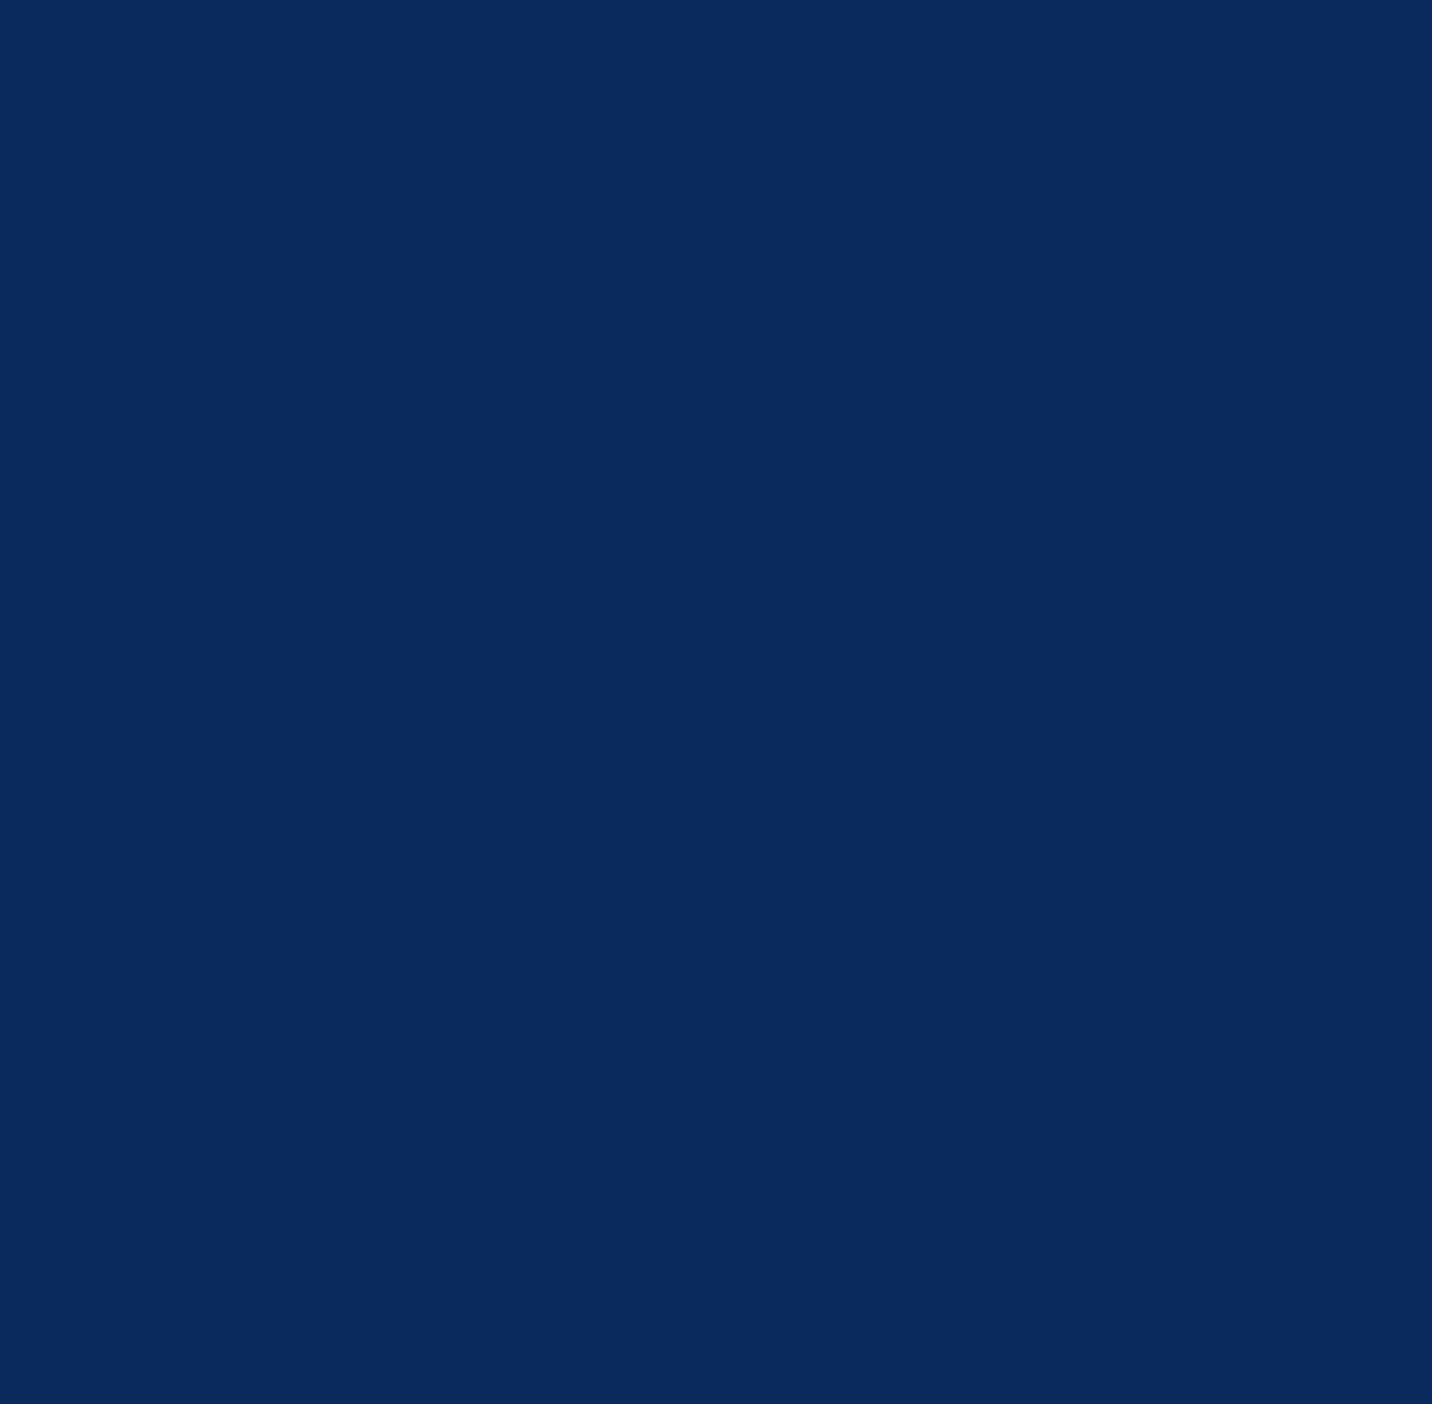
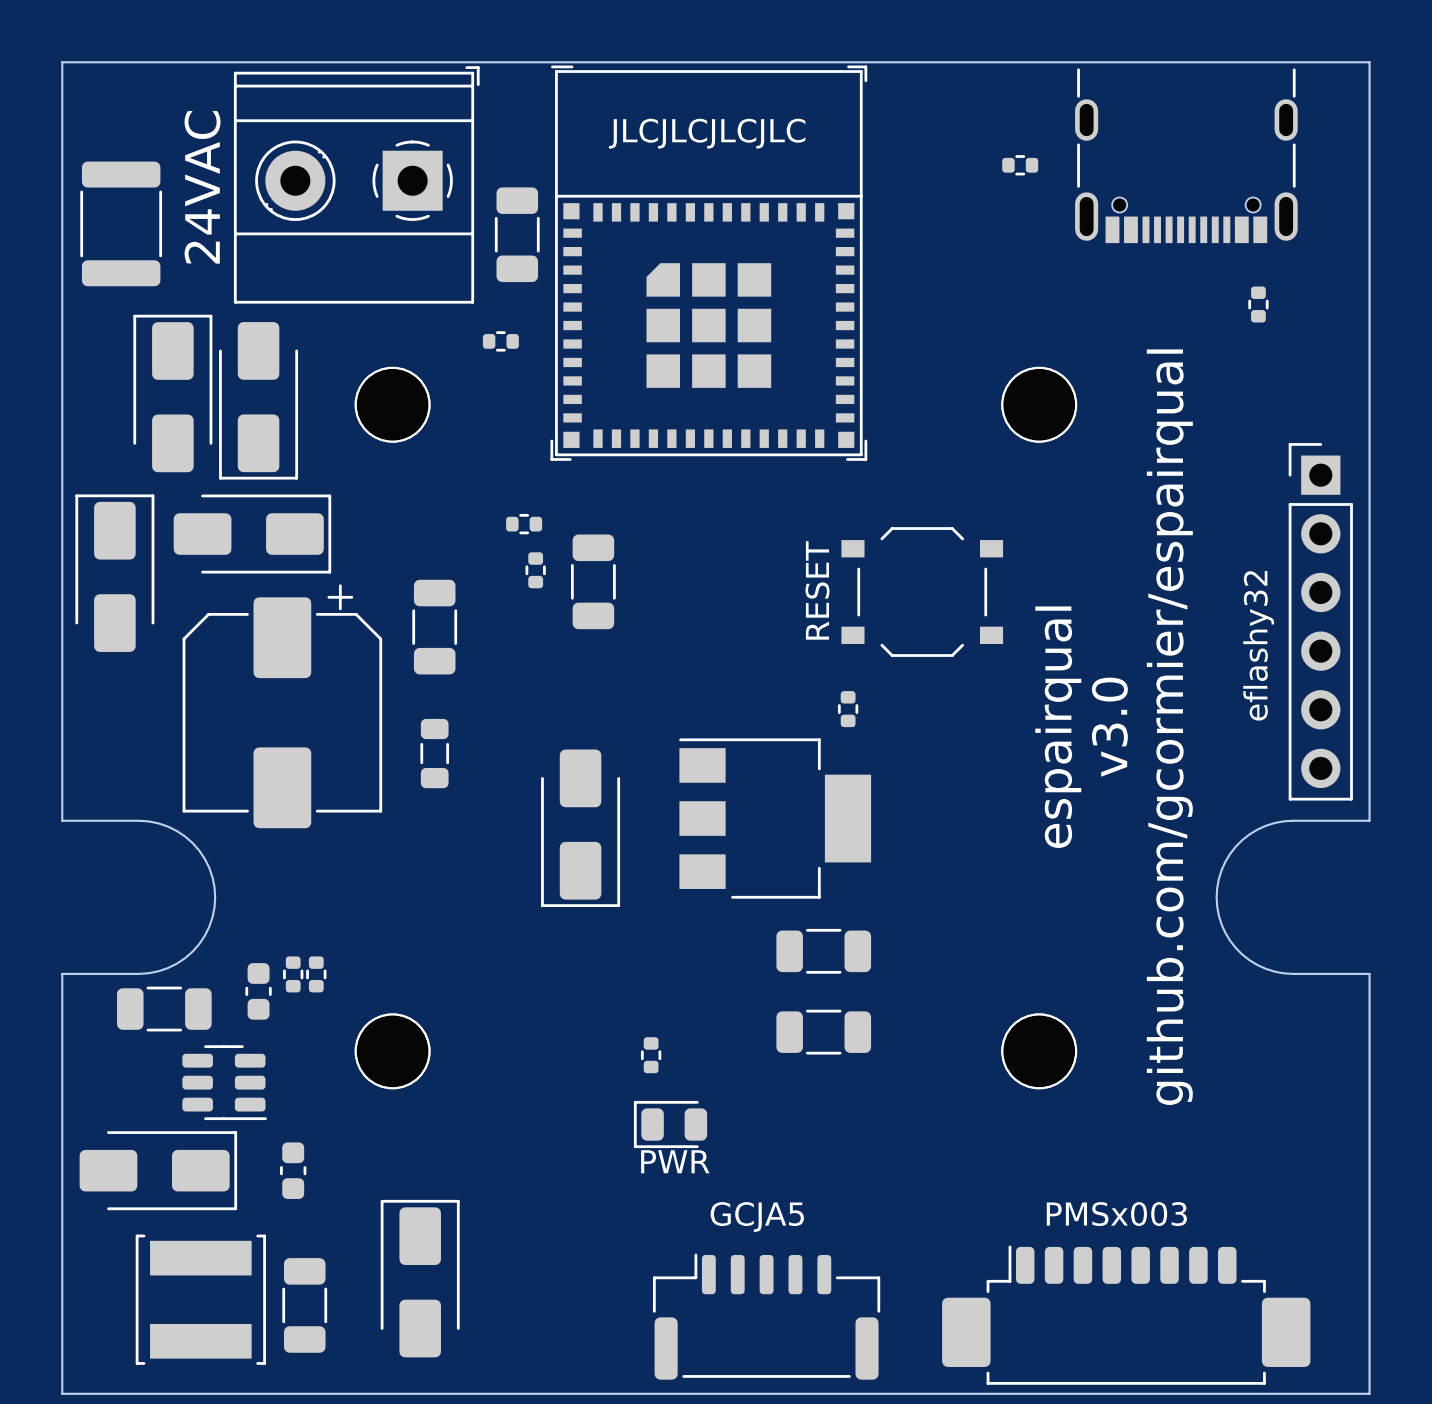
board edge: none -> (62, 62) (62, 820) (148, 821) (176, 831) (192, 843) (204, 859) (212, 877) (215, 897) (212, 917) (204, 935) (192, 951) (176, 963) (148, 973) (62, 973) (62, 1393) (1369, 1393) (1369, 973) (1283, 973) (1257, 965) (1242, 954) (1230, 940) (1218, 915) (1216, 897) (1218, 879) (1230, 853) (1242, 840) (1257, 829) (1283, 821) (1369, 820) (1369, 62) (62, 62)
text: none -> JLCJLCJLCJLC (707, 133)
part: none -> (1186, 155)
part: none -> (1020, 165)
part: none -> (356, 184)
text: none -> 24VAC (202, 187)
part: none -> (121, 223)
part: none -> (517, 234)
part: none -> (708, 263)
part: none -> (1258, 304)
part: none -> (500, 341)
drawing: none -> [354, 366, 431, 443]
drawing: none -> [1001, 366, 1078, 443]
part: none -> (172, 393)
part: none -> (258, 400)
part: none -> (392, 404)
part: none -> (1039, 404)
part: none -> (524, 524)
part: none -> (252, 534)
part: none -> (535, 570)
part: none -> (114, 573)
part: none -> (593, 581)
part: none -> RESET (922, 592)
part: none -> eflashy32 (1320, 621)
part: none -> (434, 627)
part: none -> (282, 706)
part: none -> (848, 709)
text: none -> espairqual (1058, 727)
text: none -> v3.0 (1109, 727)
text: none -> github.com/gcormier/espairqual (1169, 727)
part: none -> (434, 753)
part: none -> (775, 818)
part: none -> (580, 828)
part: none -> (823, 951)
part: none -> (293, 974)
part: none -> (316, 974)
part: none -> (258, 991)
part: none -> (164, 1009)
drawing: none -> [354, 1013, 431, 1090]
drawing: none -> [1001, 1013, 1078, 1090]
part: none -> (823, 1032)
part: none -> (392, 1051)
part: none -> (1039, 1051)
part: none -> (651, 1055)
part: none -> (224, 1082)
part: none -> PWR (670, 1124)
part: none -> (158, 1170)
part: none -> (293, 1170)
text: none -> PMSx003 (1116, 1214)
text: none -> GCJA5 (757, 1217)
part: none -> (420, 1278)
part: none -> (200, 1299)
part: none -> (304, 1305)
part: none -> (1126, 1315)
part: none -> (766, 1316)

